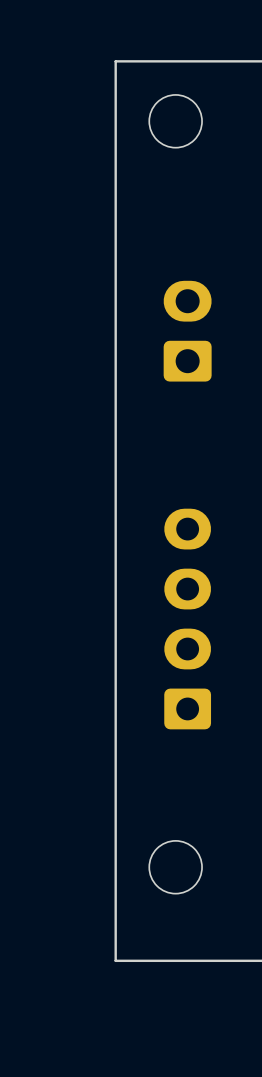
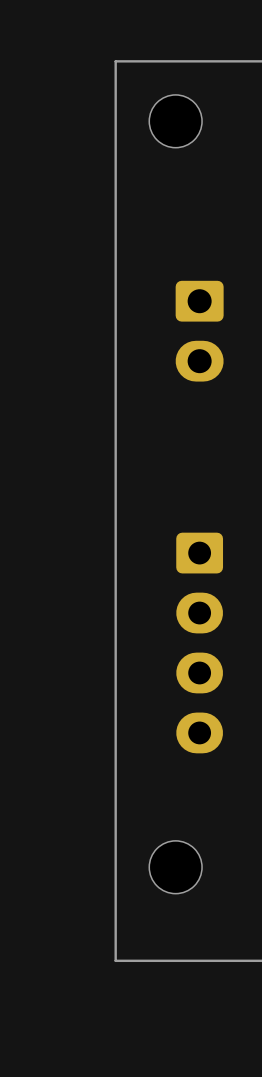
part rotation: 0° (187, 331) -> 180° (199, 331)
part rotation: 0° (187, 619) -> 180° (199, 643)

